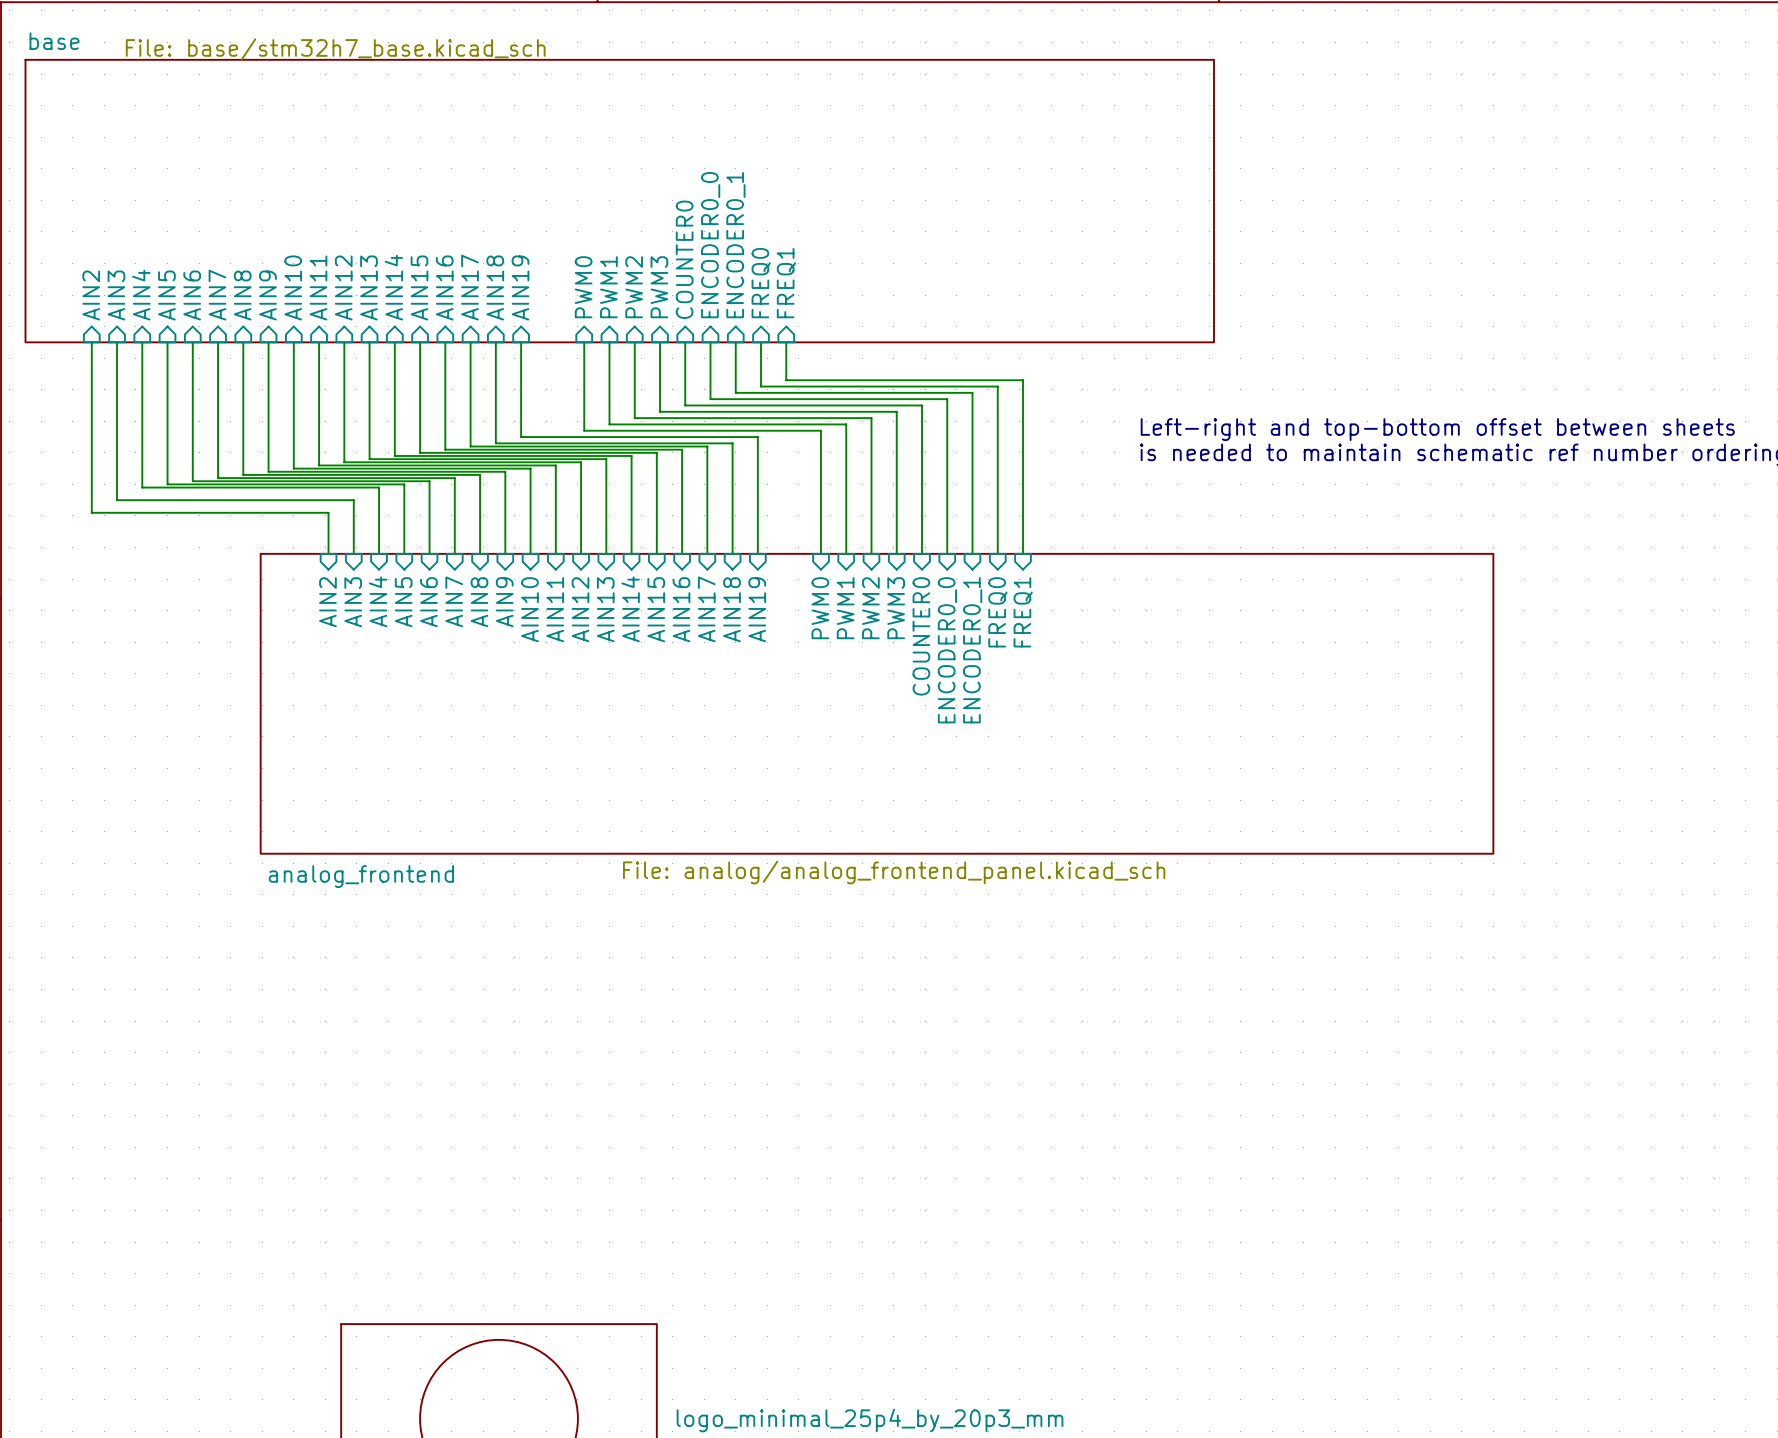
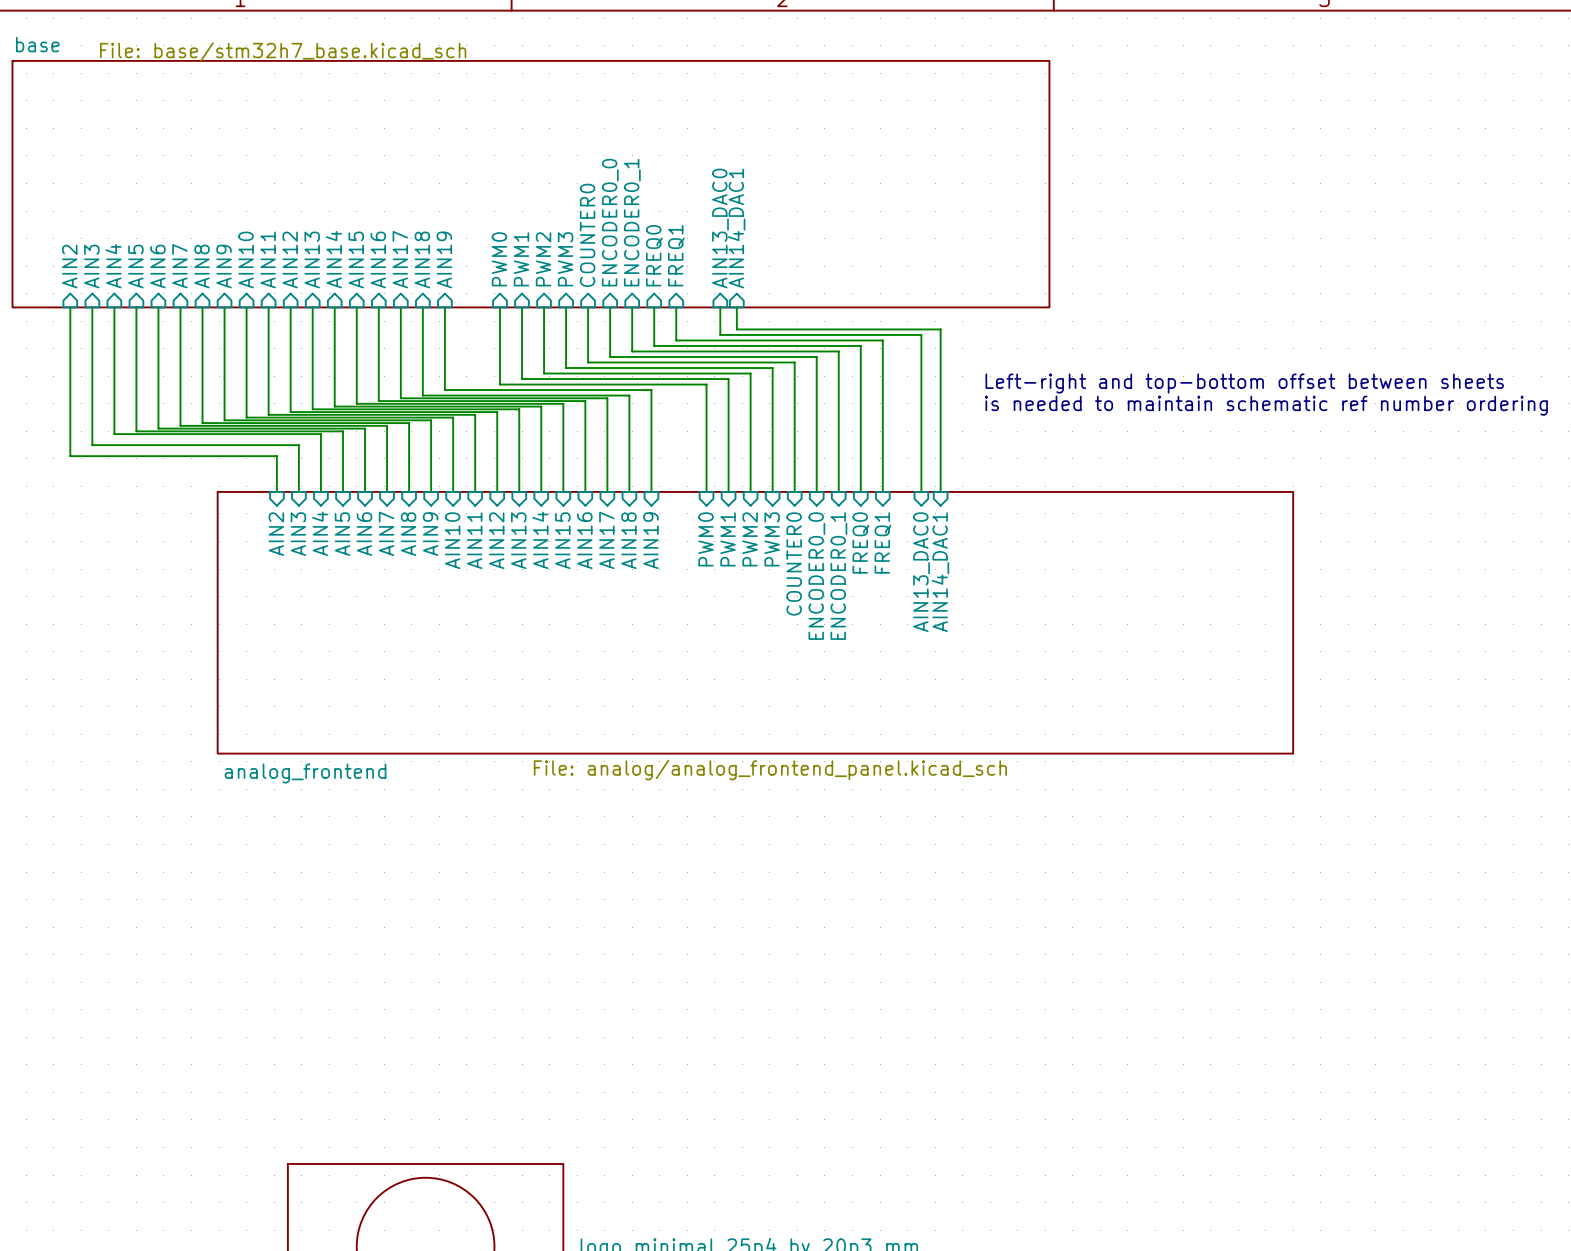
sheet pin: none -> AIN13_DAC0 (720, 228)
sheet pin: none -> AIN14_DAC1 (736, 228)
wire: none -> (720, 307) (720, 334) (921, 334) (921, 491)
wire: none -> (736, 307) (736, 329) (940, 329) (940, 491)
sheet pin: none -> AIN13_DAC0 (921, 572)
sheet pin: none -> AIN14_DAC1 (940, 572)

